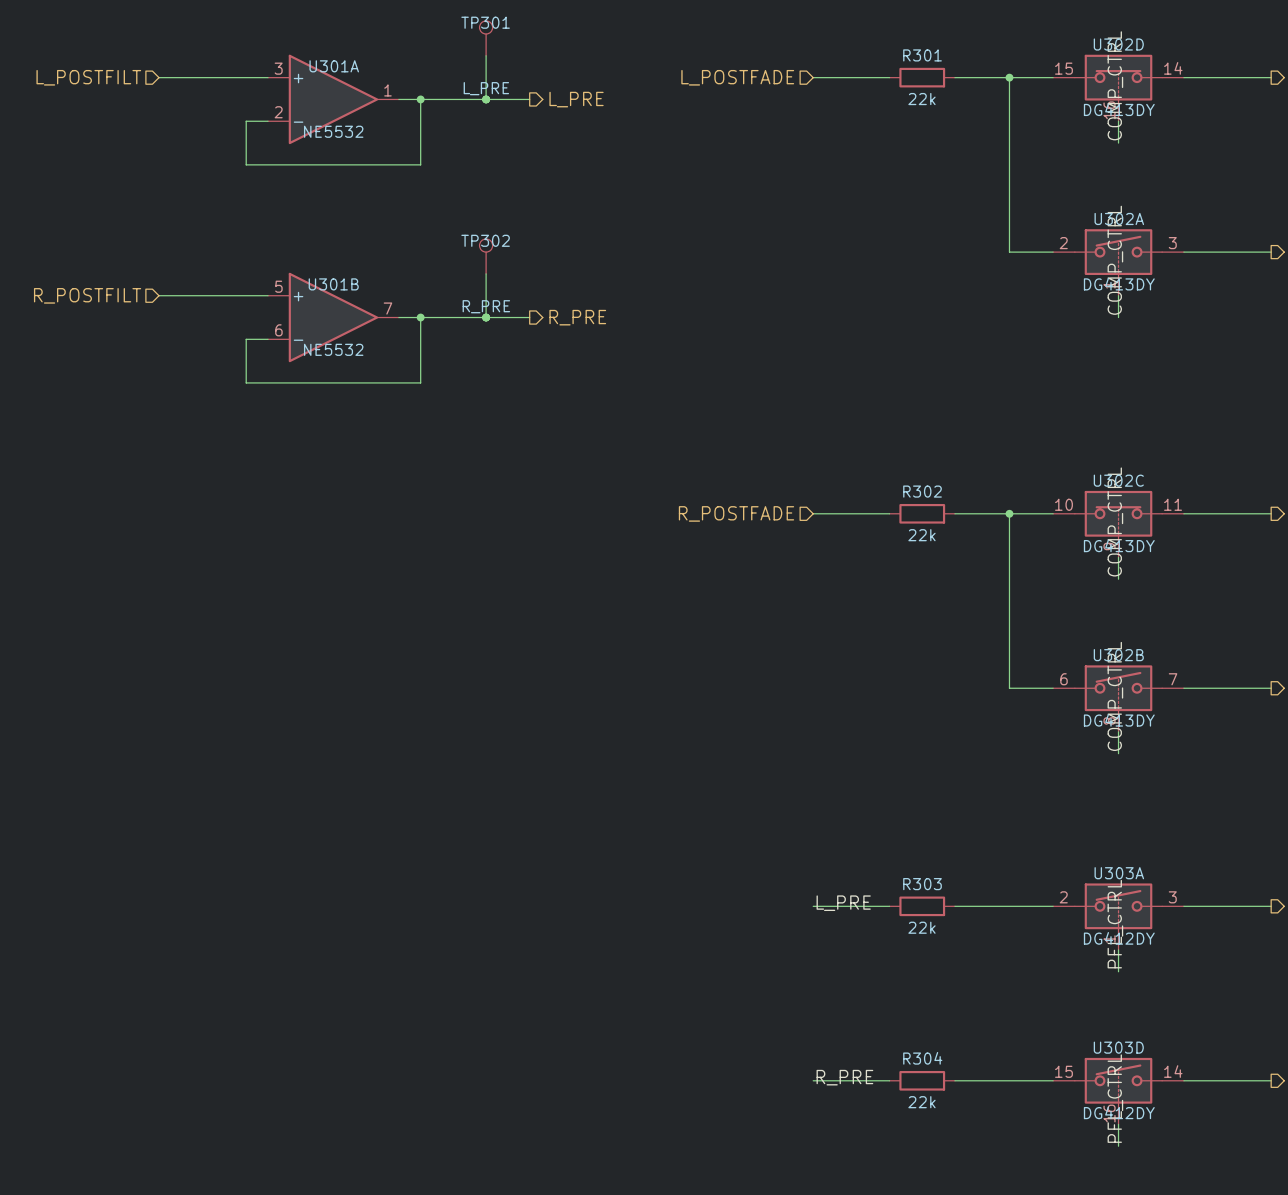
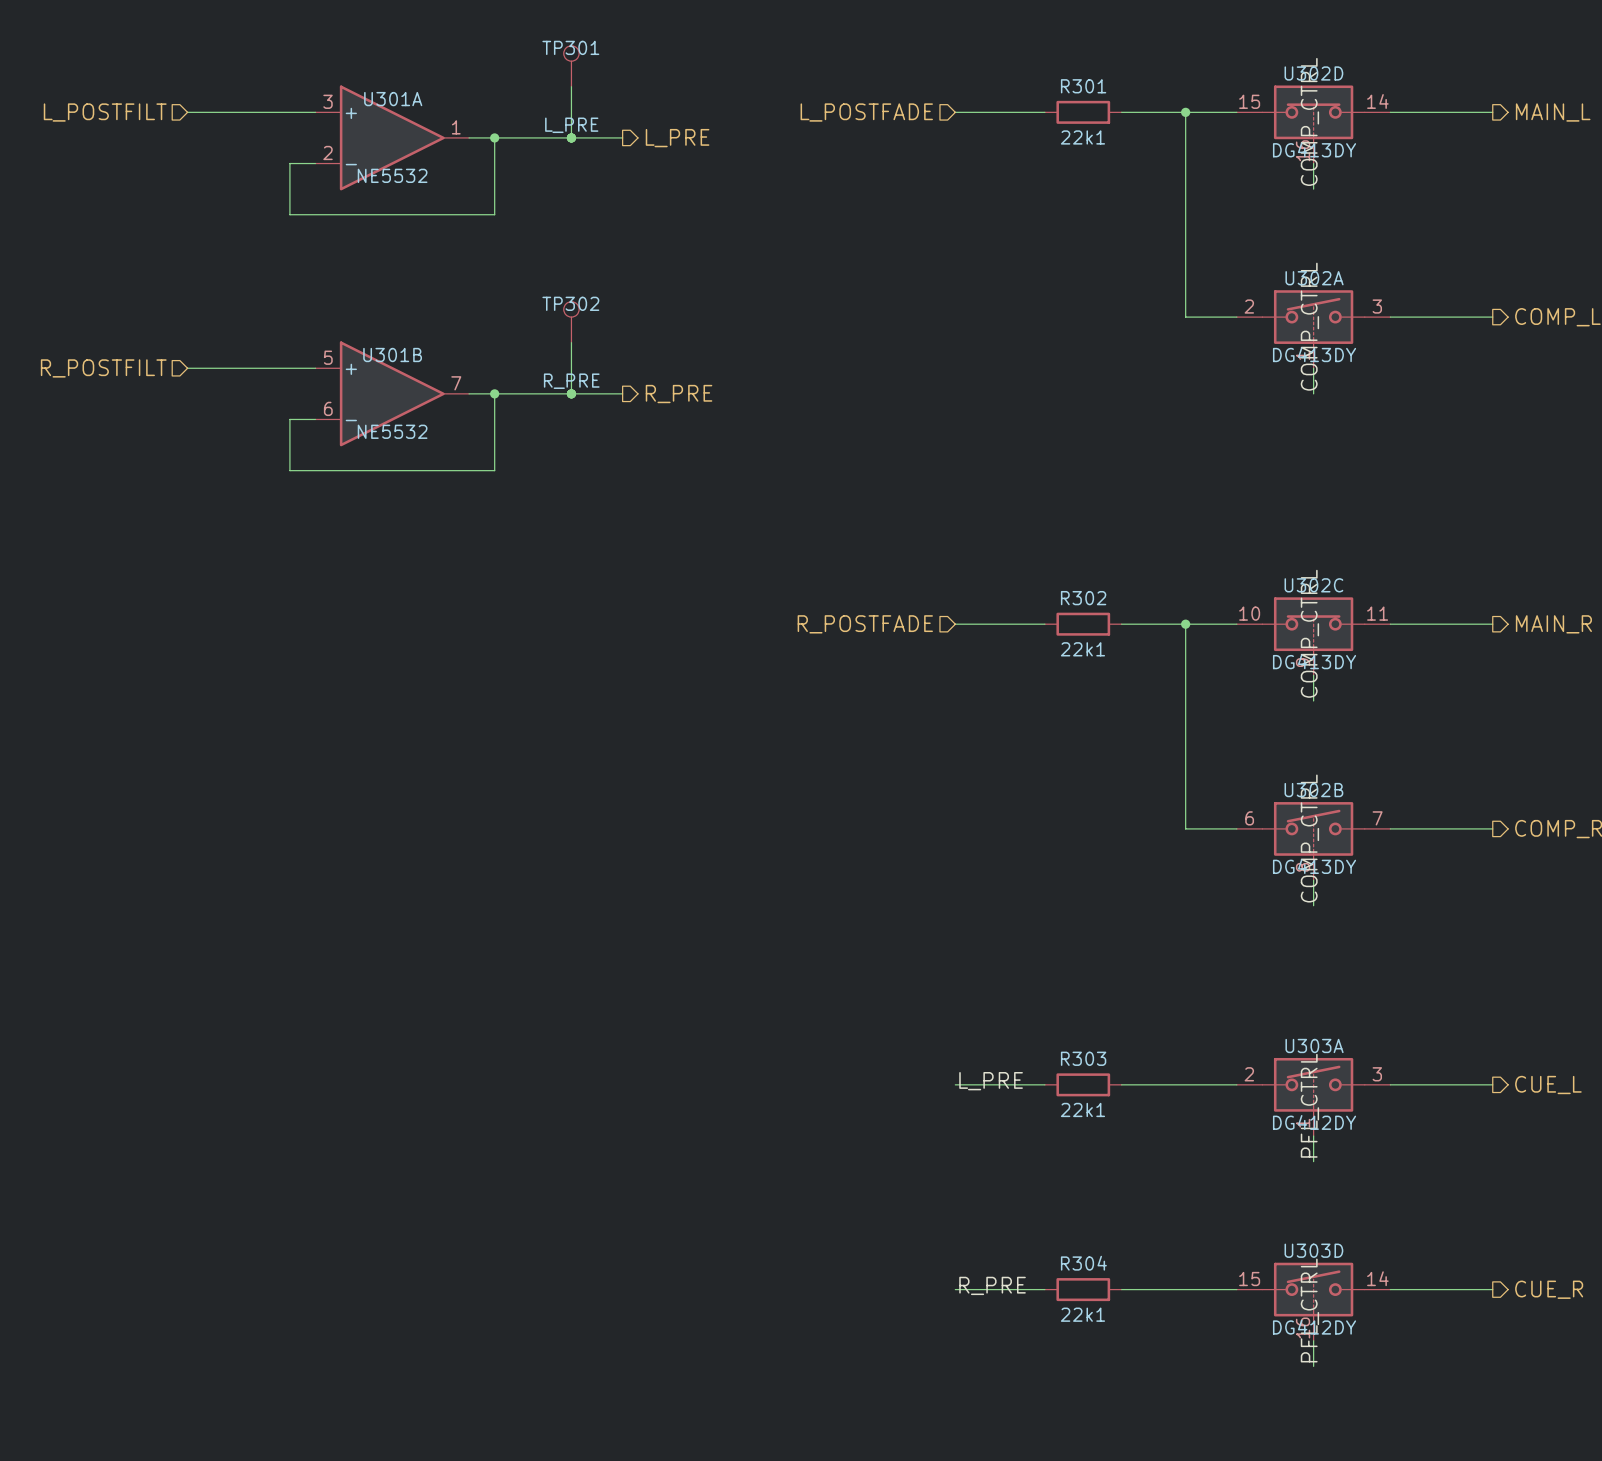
R301 value: 22k (921, 99) -> 22k1 (1082, 137)
R302 value: 22k (921, 535) -> 22k1 (1082, 649)
R303 value: 22k (921, 927) -> 22k1 (1082, 1109)
R304 value: 22k (921, 1102) -> 22k1 (1082, 1314)

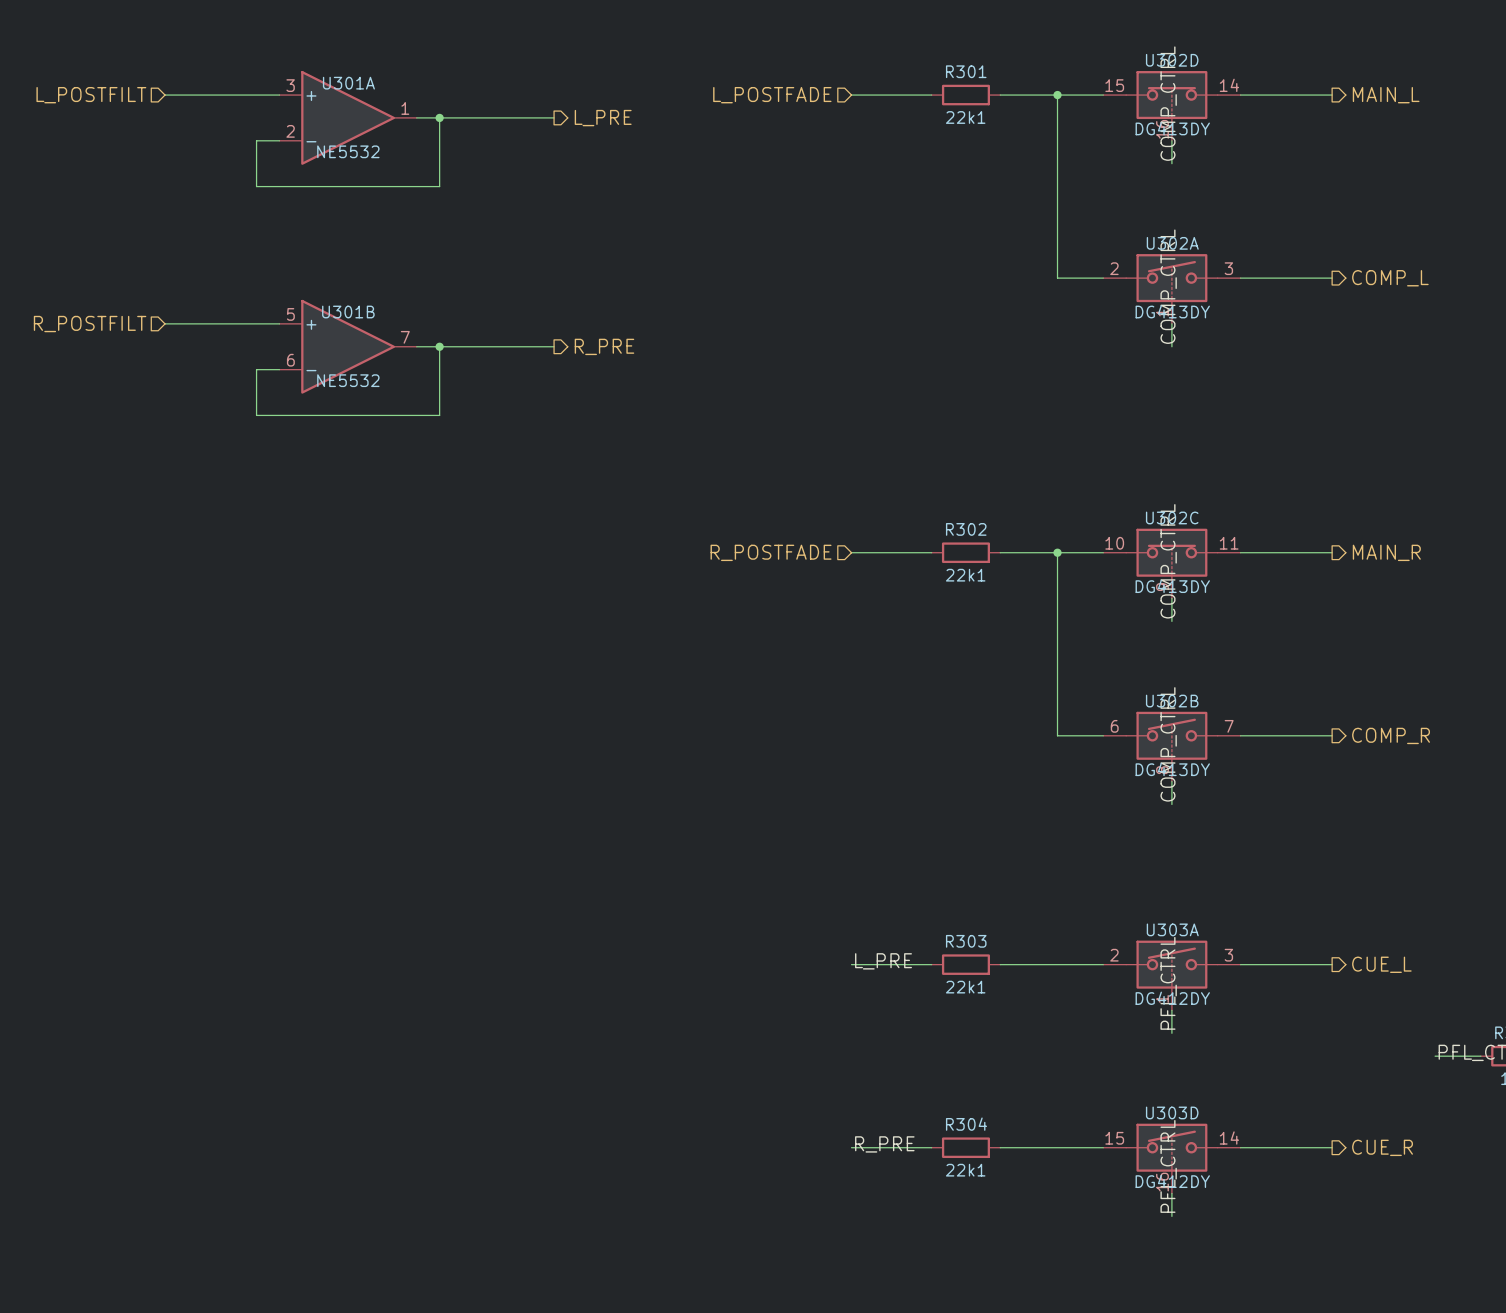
TP301: L_PRE (571, 66) -> none
wire: (571, 86) (571, 137) -> none
junction: (571, 137) -> none
TP302: R_PRE (571, 322) -> none
wire: (571, 342) (571, 393) -> none
junction: (571, 393) -> none

